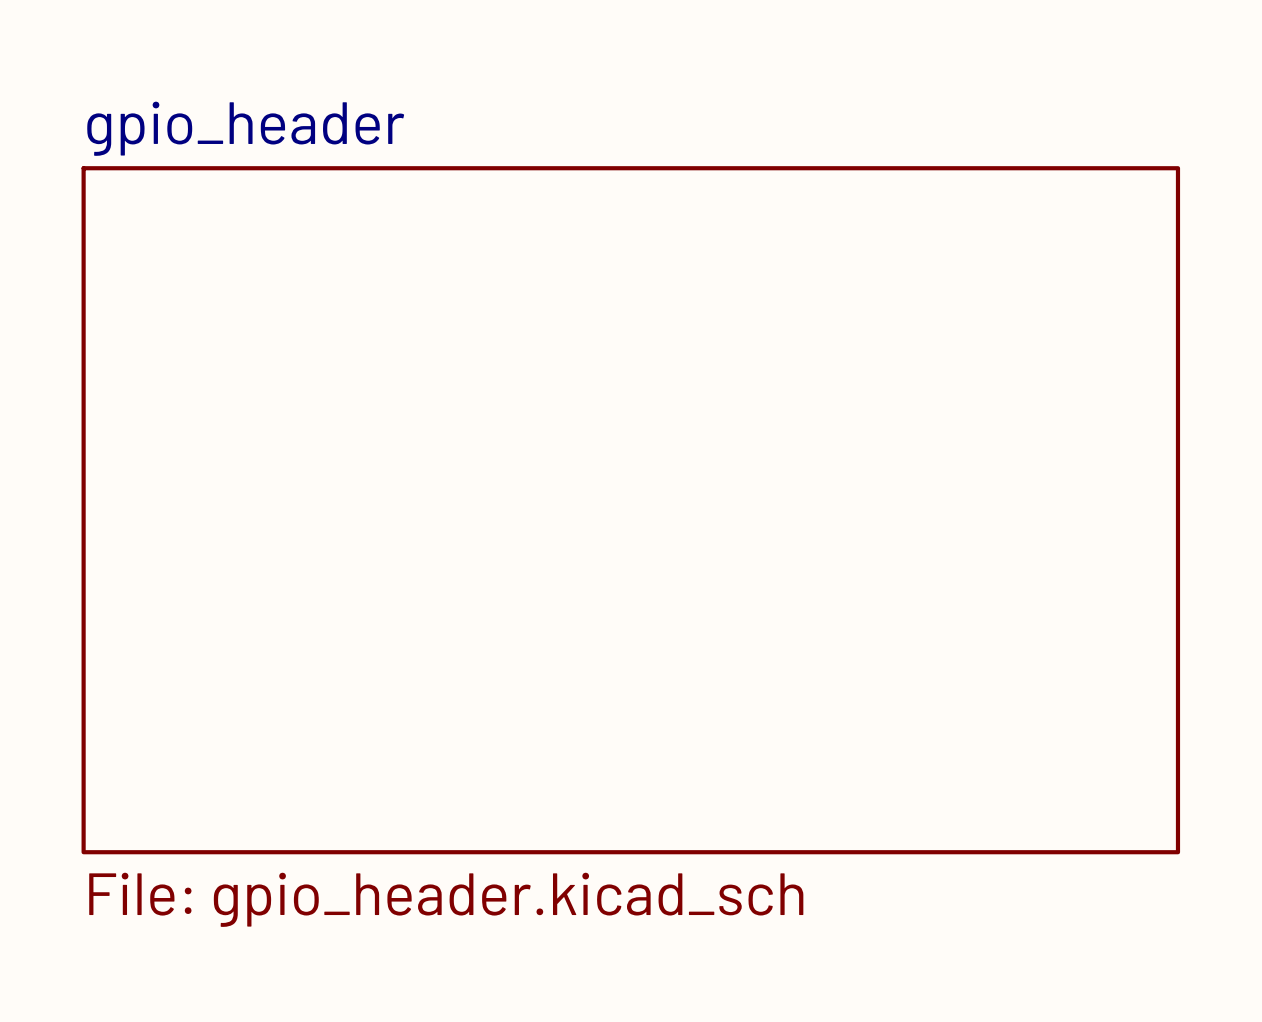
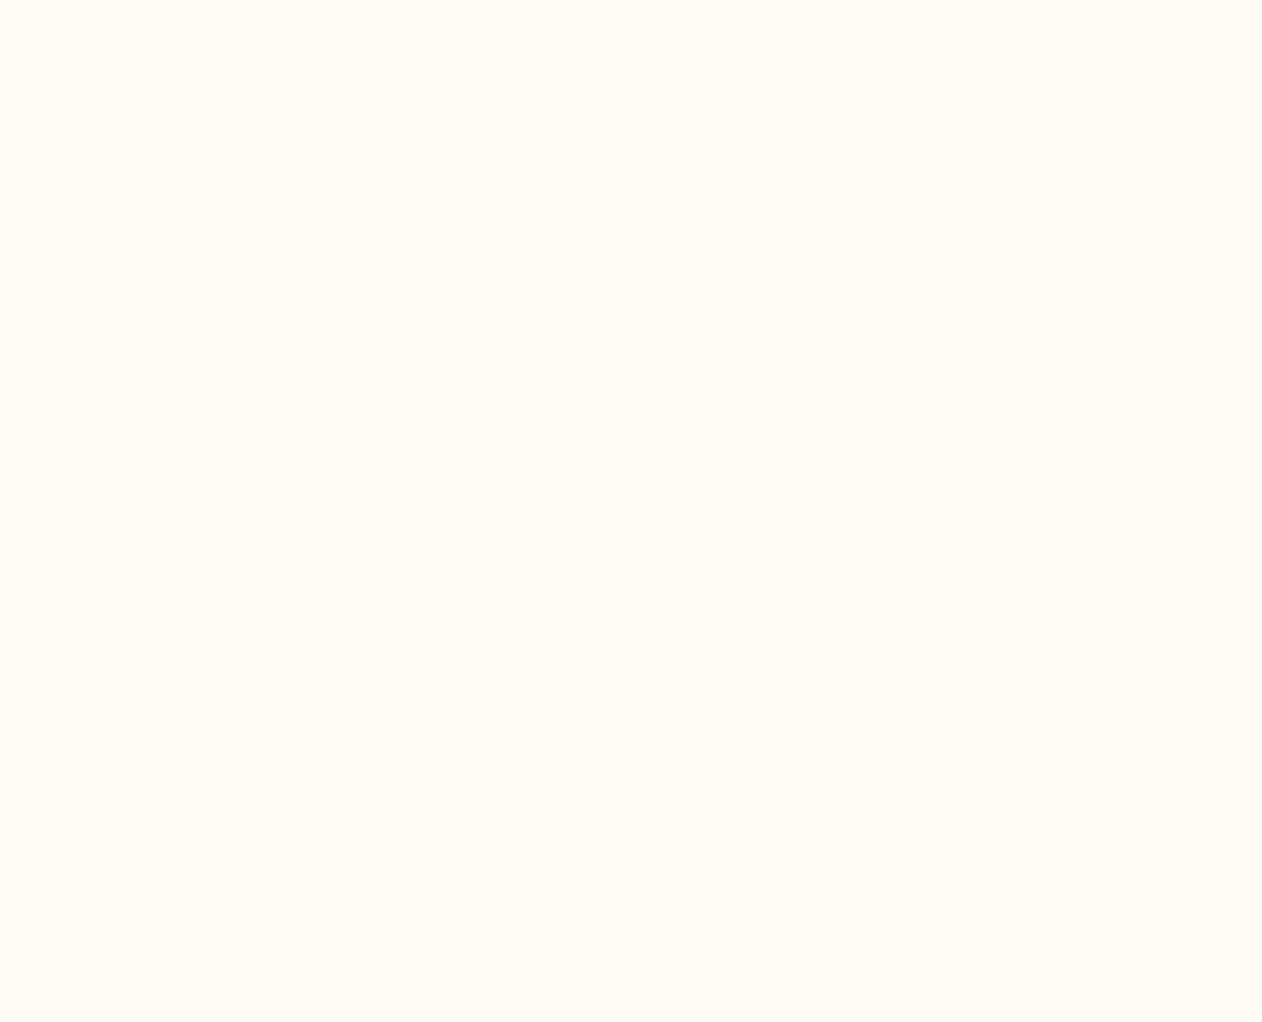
sheet gpio_header: File: gpio_header.kicad_sch (630, 510) -> none

